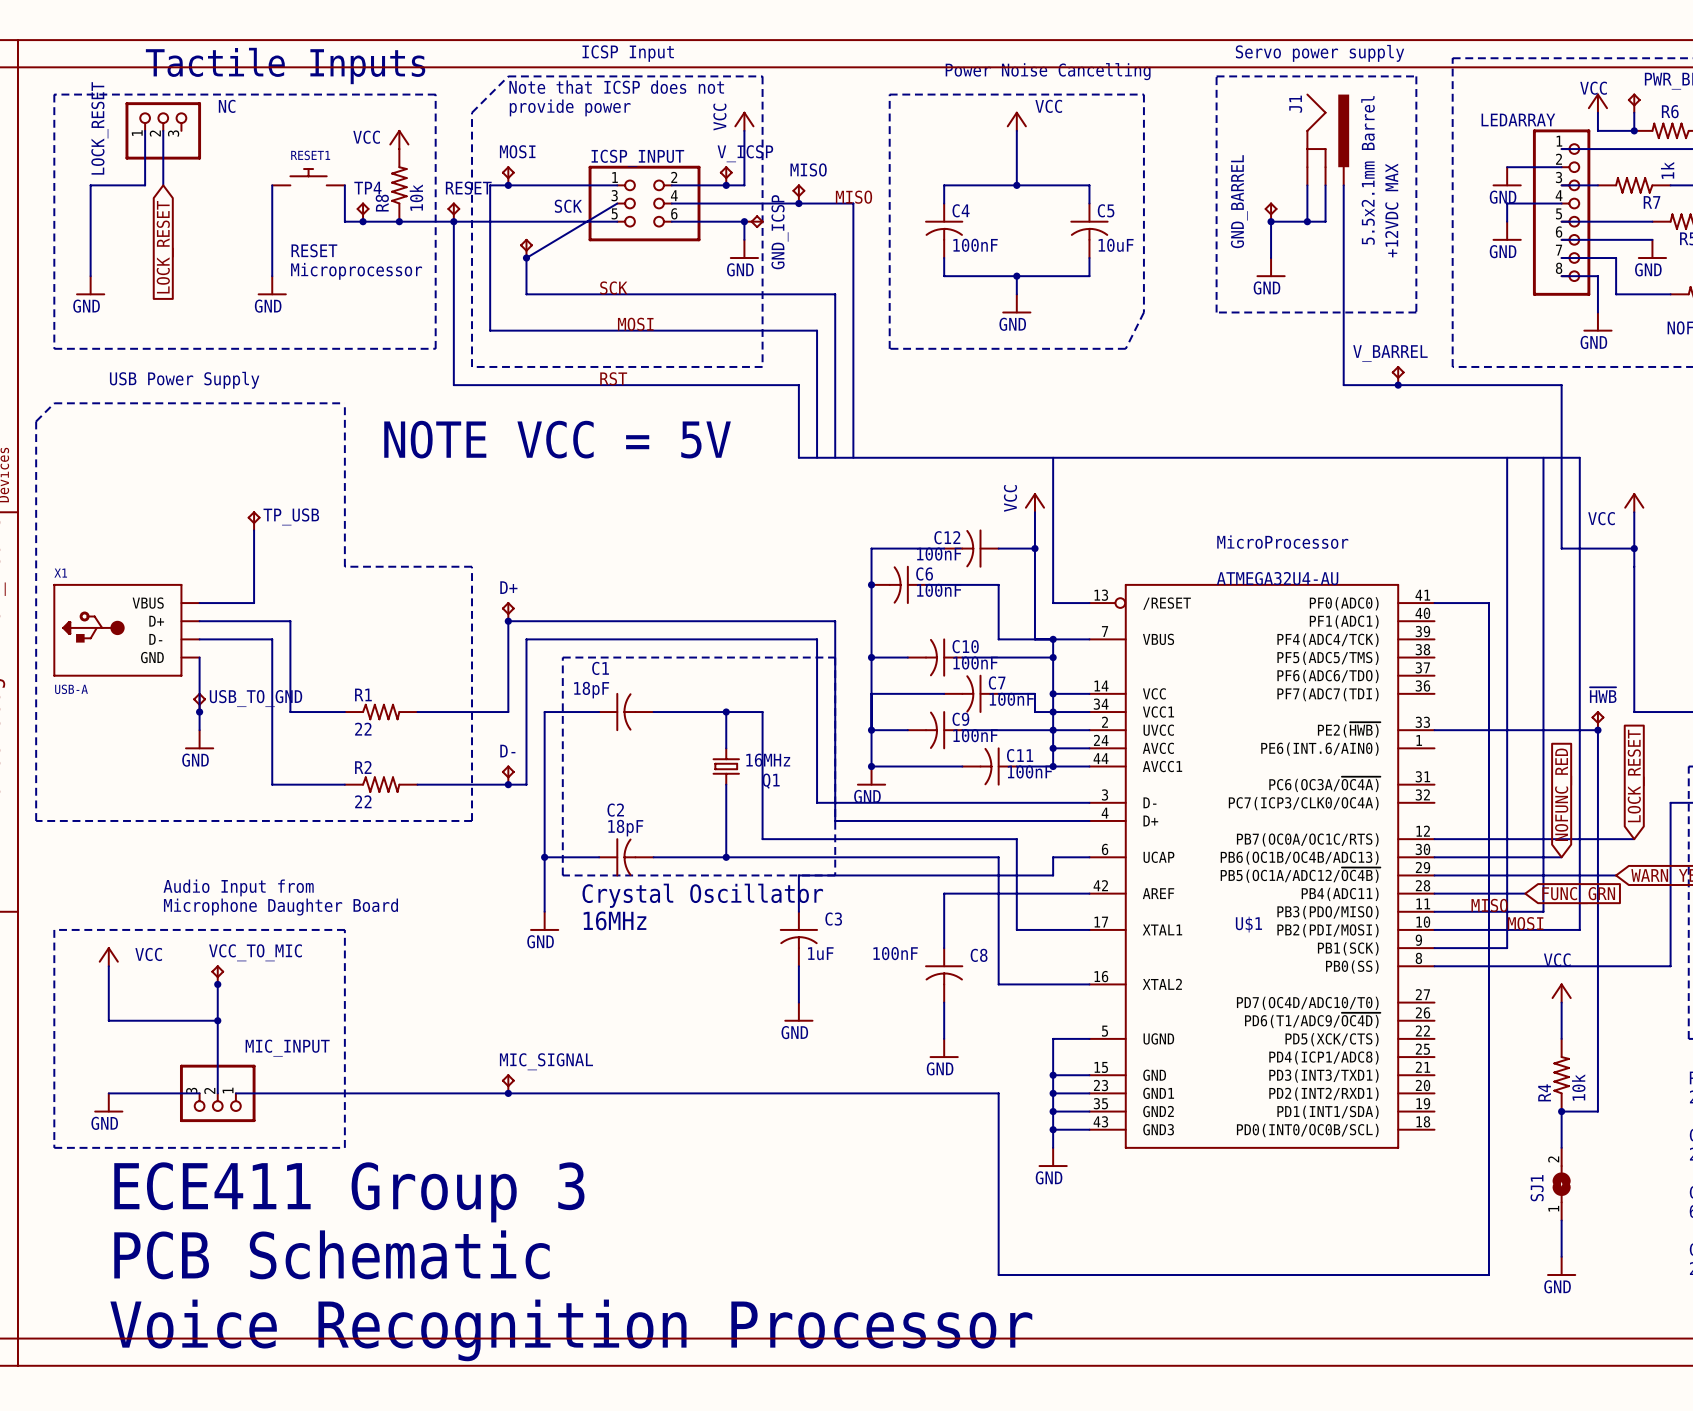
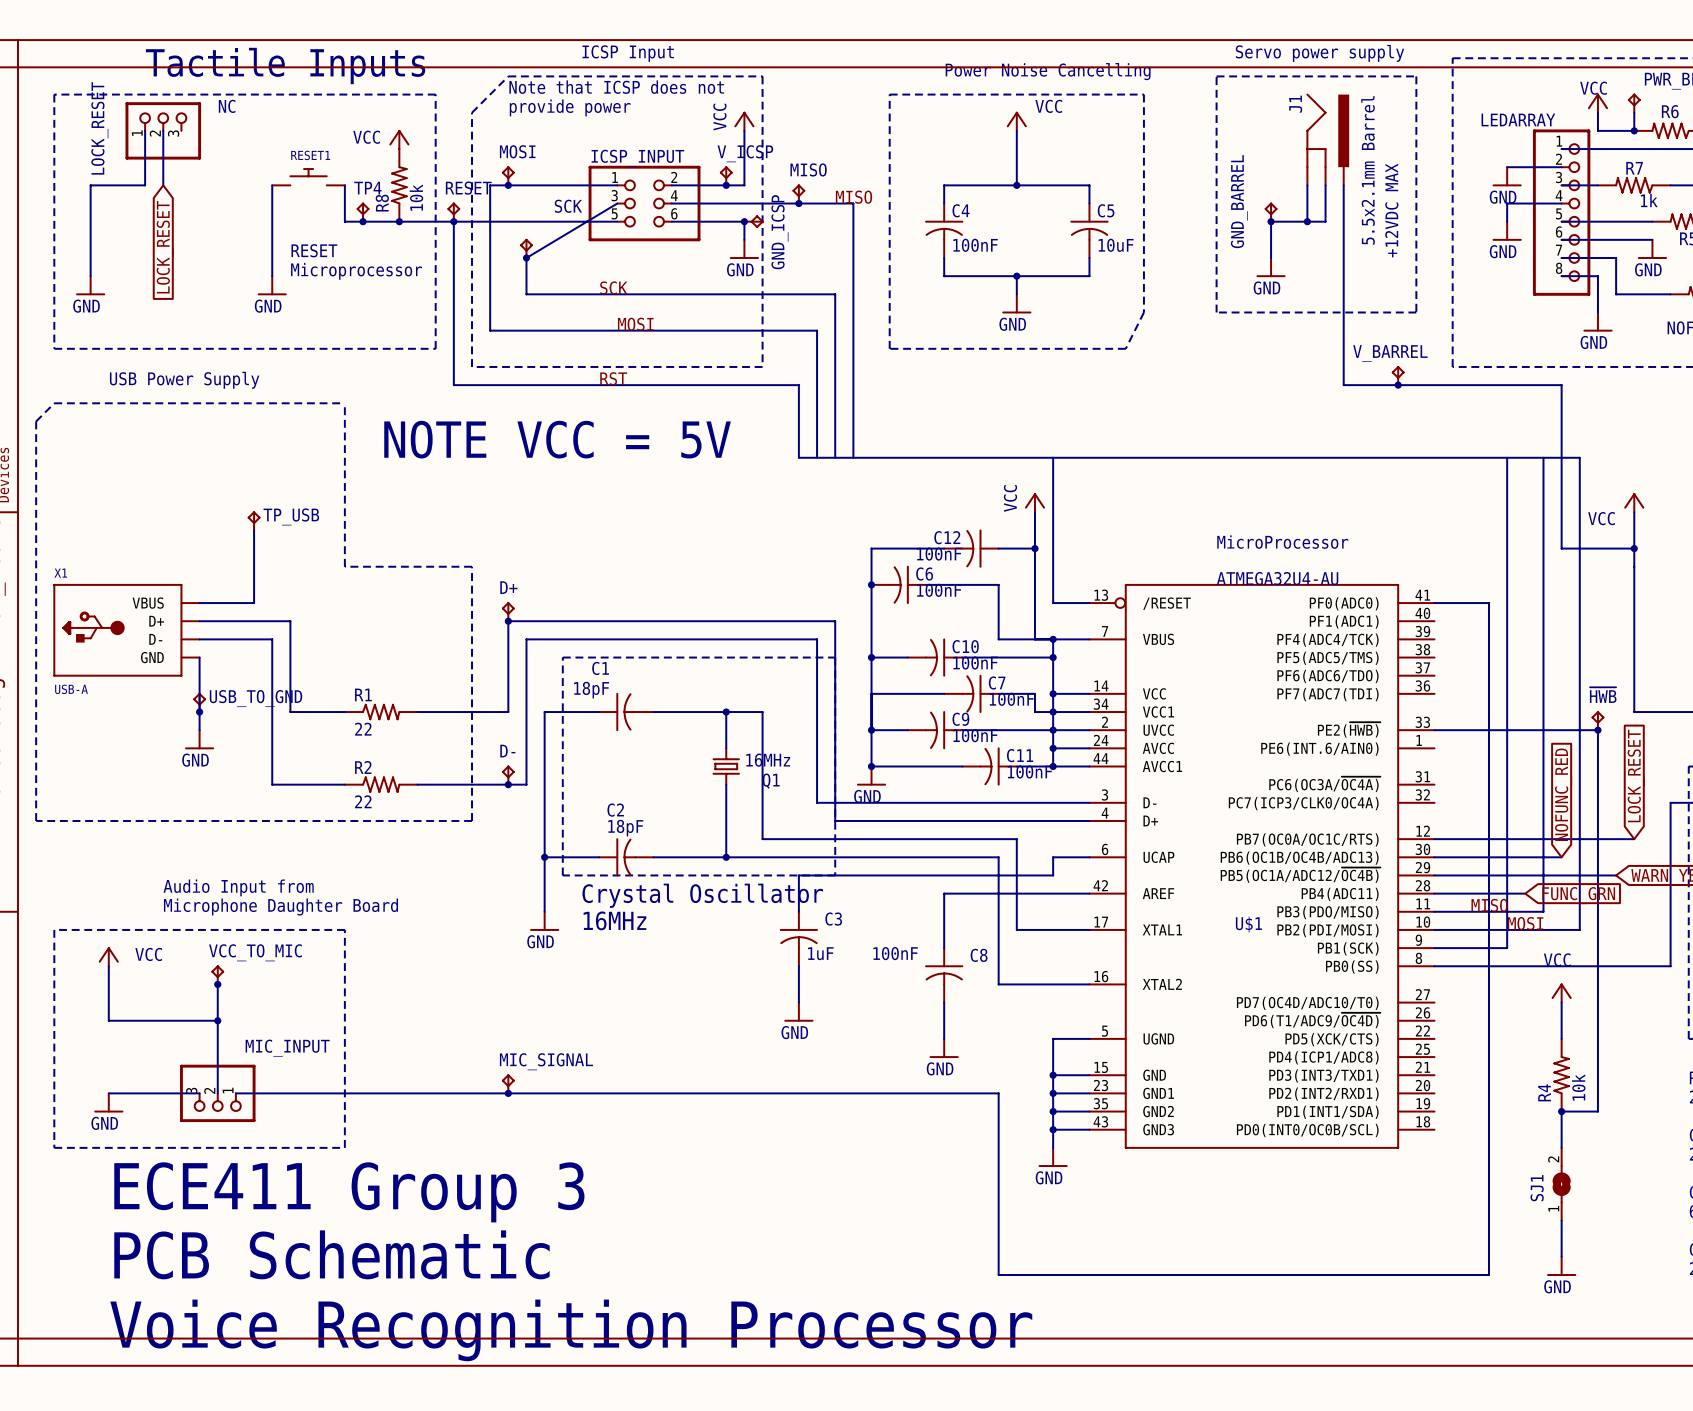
R7 value rotation: 0° (1667, 170) -> 90° clockwise (1649, 200)
R7 value position: 1k (1667, 170) -> 1k (1649, 200)
R7 name position: R7 (1652, 202) -> R7 (1634, 168)

